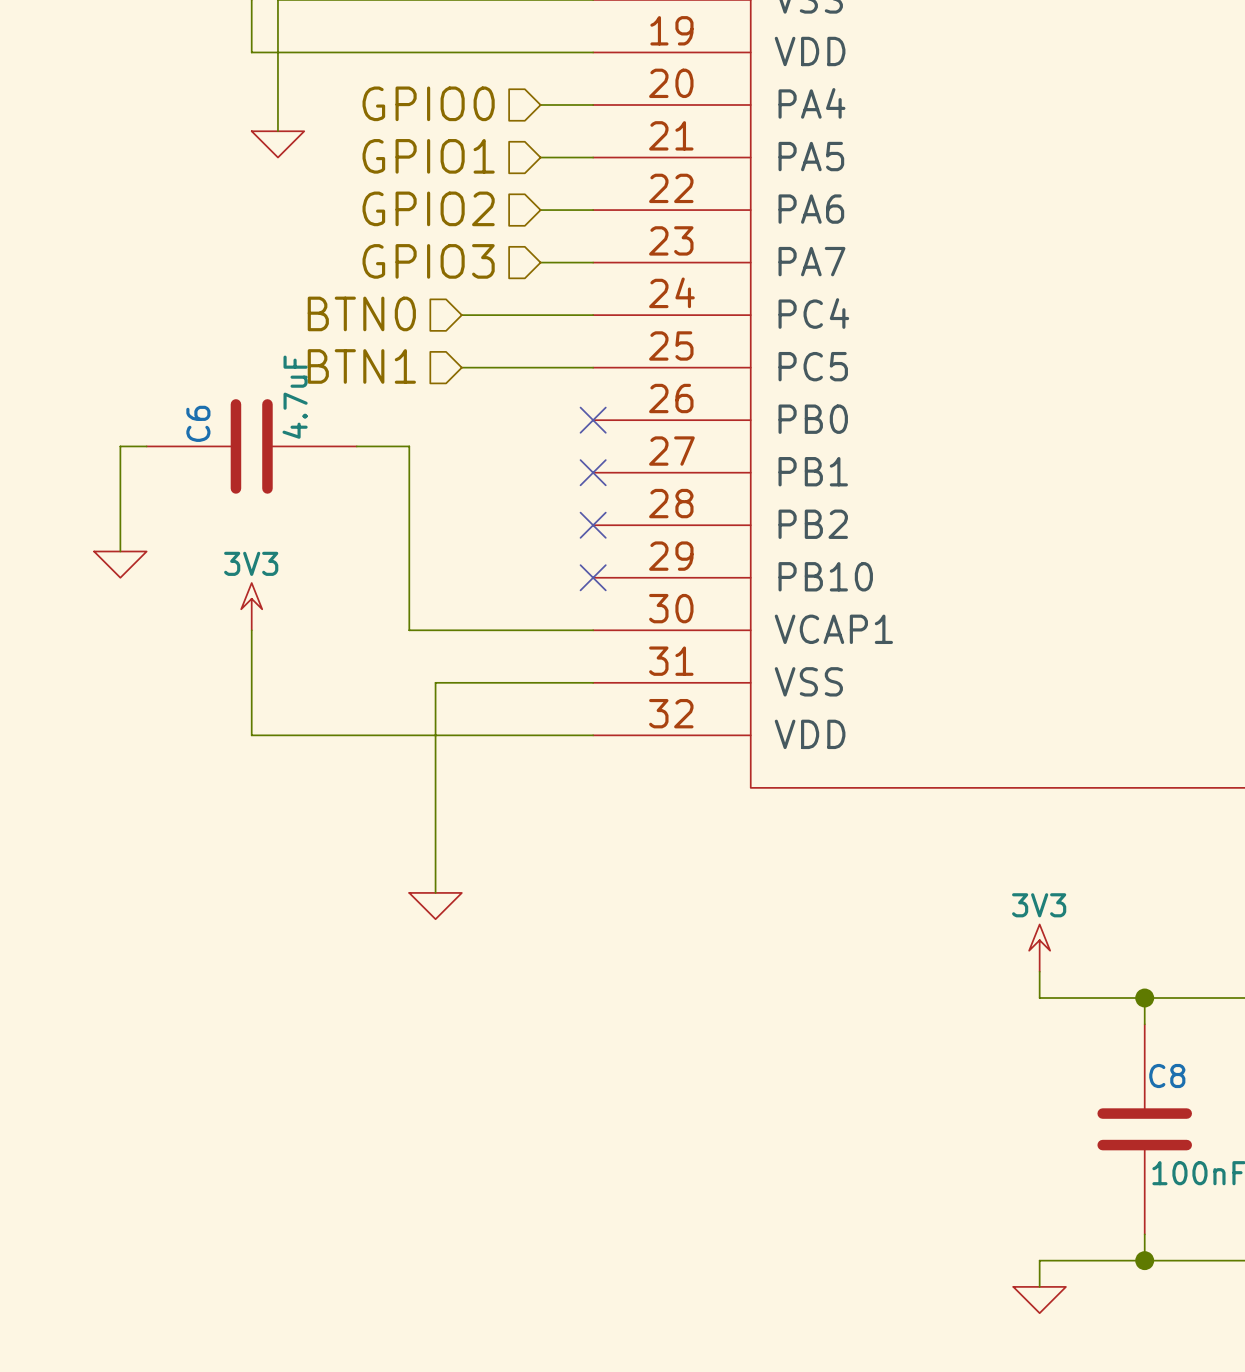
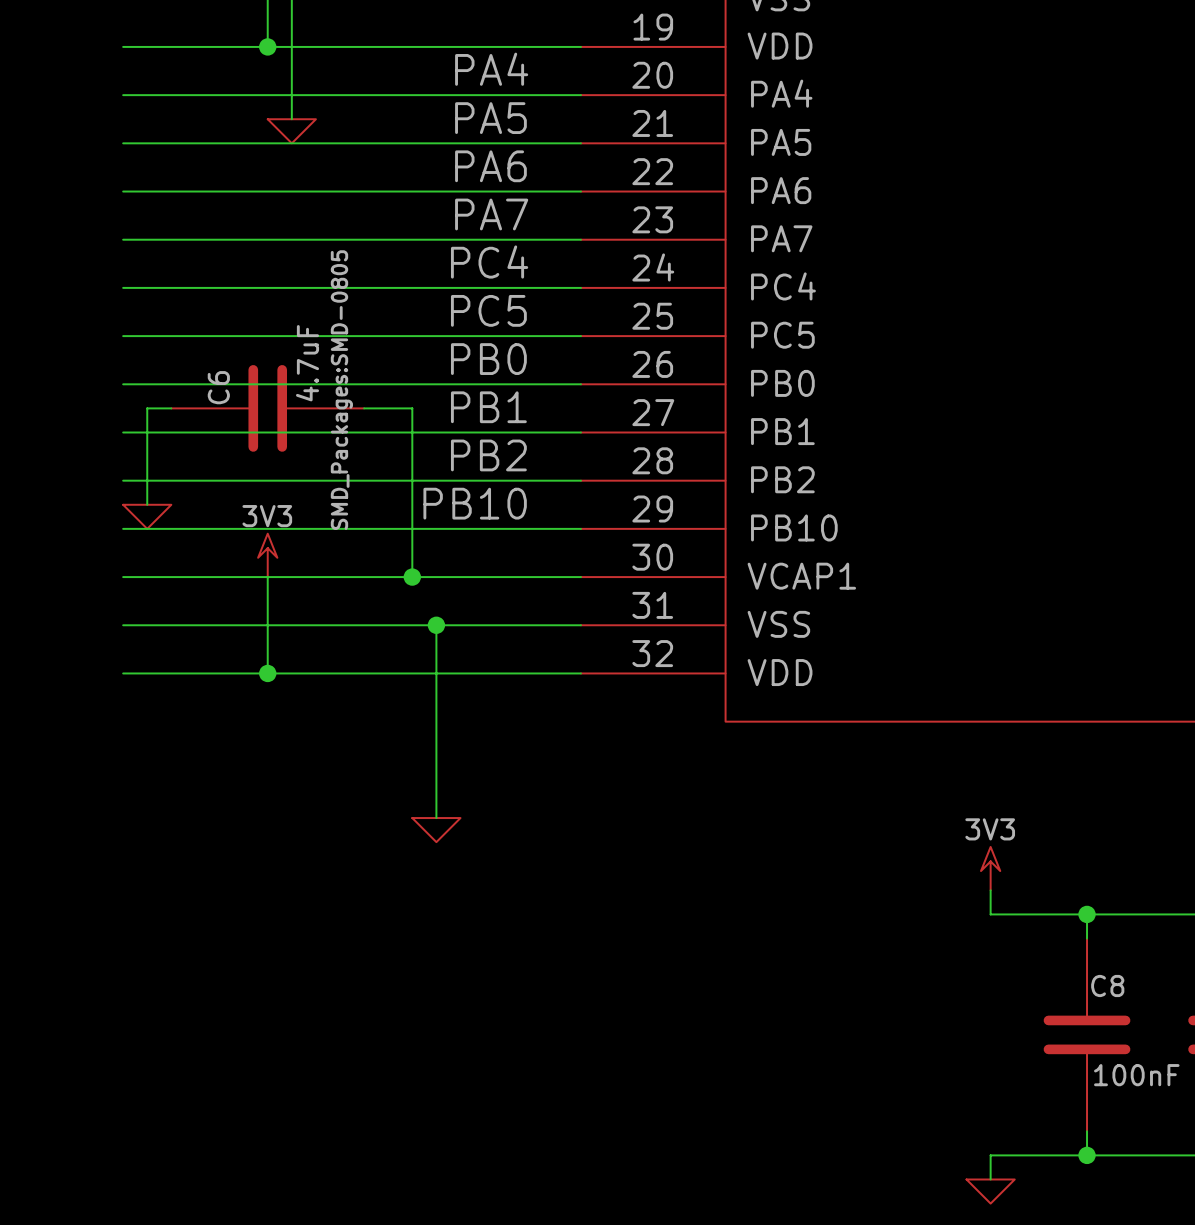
wire: none -> (123, 46) (267, 46)
junction: none -> (267, 46)
label: none -> PA4 (491, 69)
hierarchical label: GPIO0 (428, 103) -> none
wire: none -> (123, 95) (532, 95)
label: none -> PA5 (490, 118)
hierarchical label: GPIO1 (428, 156) -> none
wire: none -> (123, 143) (532, 143)
label: none -> PA6 (490, 166)
hierarchical label: GPIO2 (428, 208) -> none
wire: none -> (123, 191) (532, 191)
label: none -> PA7 (491, 214)
hierarchical label: GPIO3 (428, 261) -> none
wire: none -> (123, 239) (532, 239)
label: none -> PC4 (489, 261)
hierarchical label: BTN0 (361, 313) -> none
wire: none -> (123, 287) (460, 287)
label: none -> PC5 (488, 310)
hierarchical label: BTN1 (361, 366) -> none
wire: none -> (123, 336) (460, 336)
label: none -> PB0 (488, 359)
wire: none -> (123, 384) (580, 384)
no-connect mark: (593, 420) -> none
C6 text: none -> SMD_Packages:SMD-0805 (341, 390)
label: none -> PB1 (488, 407)
wire: none -> (123, 432) (580, 432)
no-connect mark: (593, 472) -> none
label: none -> PB2 (488, 455)
wire: none -> (123, 480) (580, 480)
no-connect mark: (593, 525) -> none
label: none -> PB10 (475, 503)
wire: none -> (123, 528) (580, 528)
no-connect mark: (593, 577) -> none
wire: none -> (123, 577) (412, 577)
junction: none -> (412, 577)
wire: none -> (123, 625) (436, 625)
junction: none -> (436, 625)
wire: none -> (123, 673) (267, 673)
junction: none -> (267, 673)

